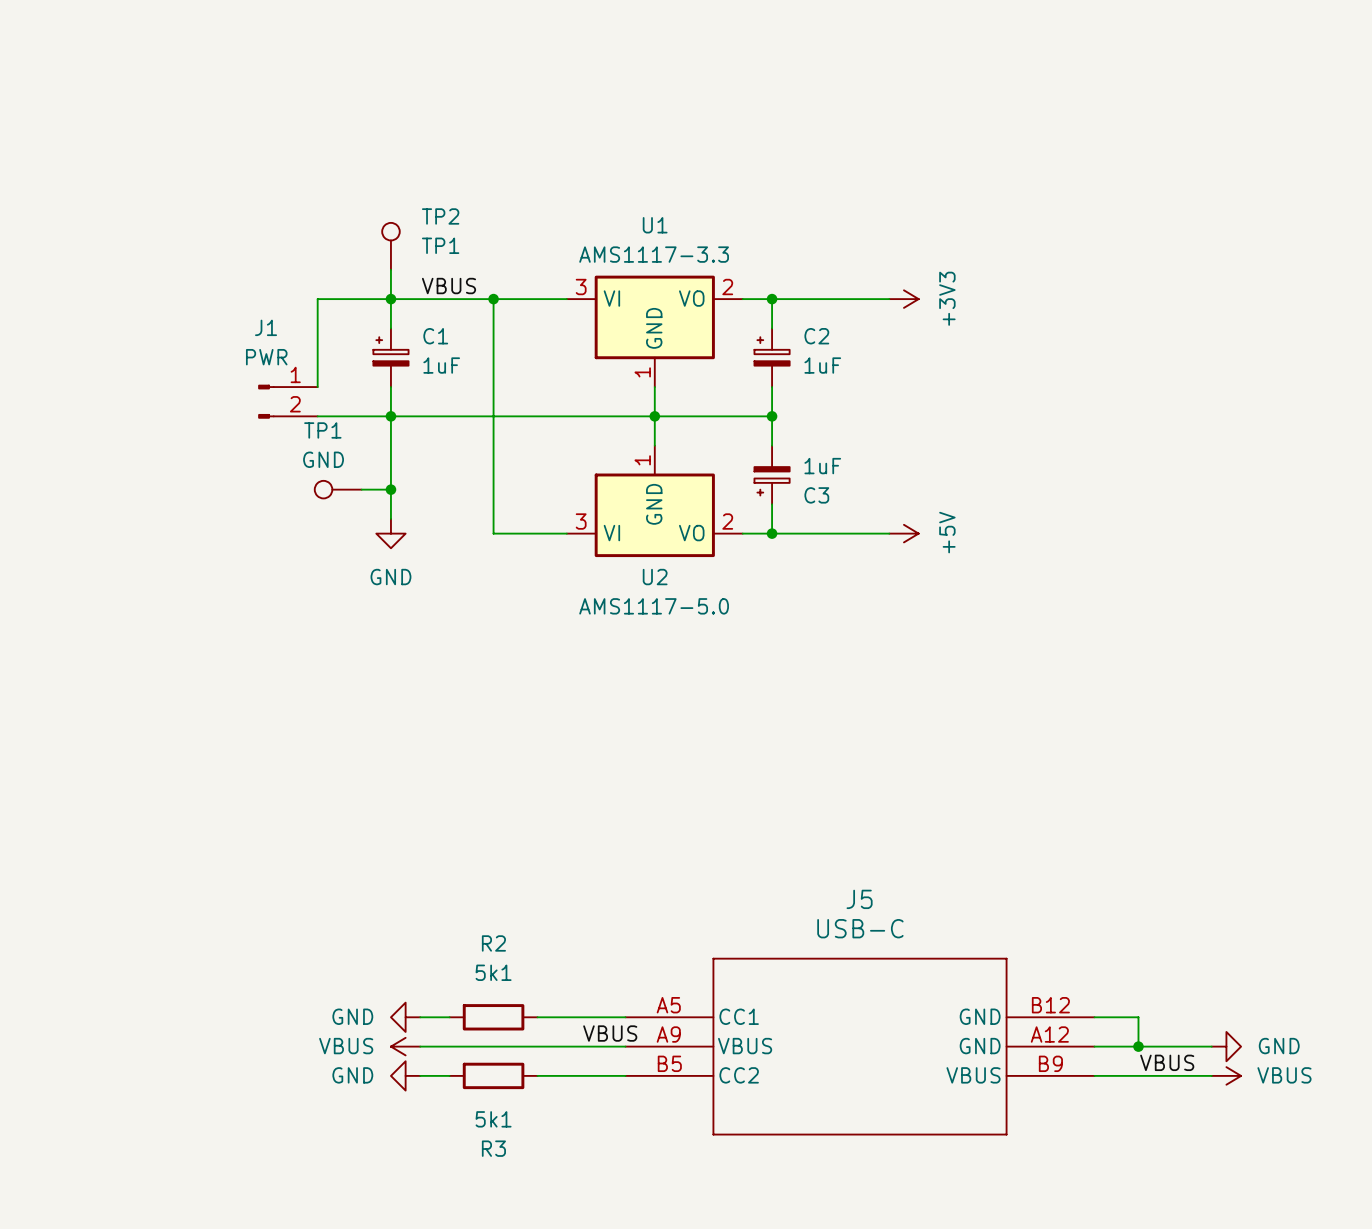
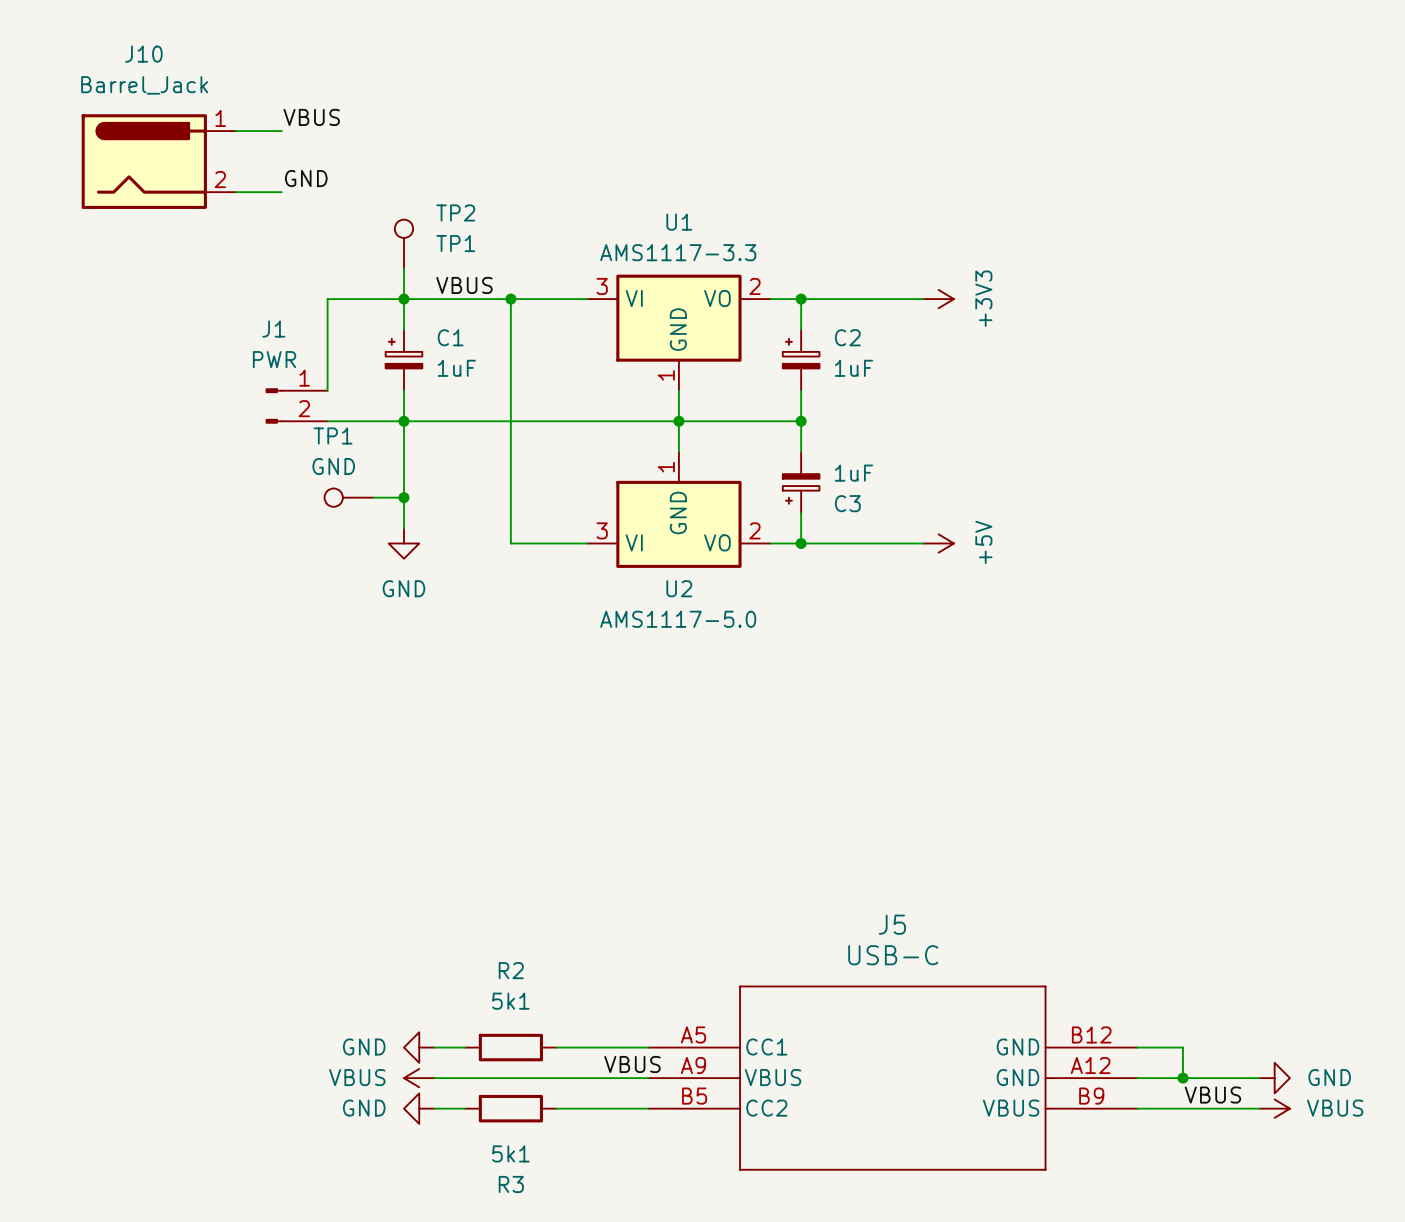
label: none -> VBUS (311, 117)
wire: none -> (235, 131) (281, 131)
J10: none -> Barrel_Jack (158, 161)
label: none -> GND (306, 178)
wire: none -> (235, 192) (281, 192)

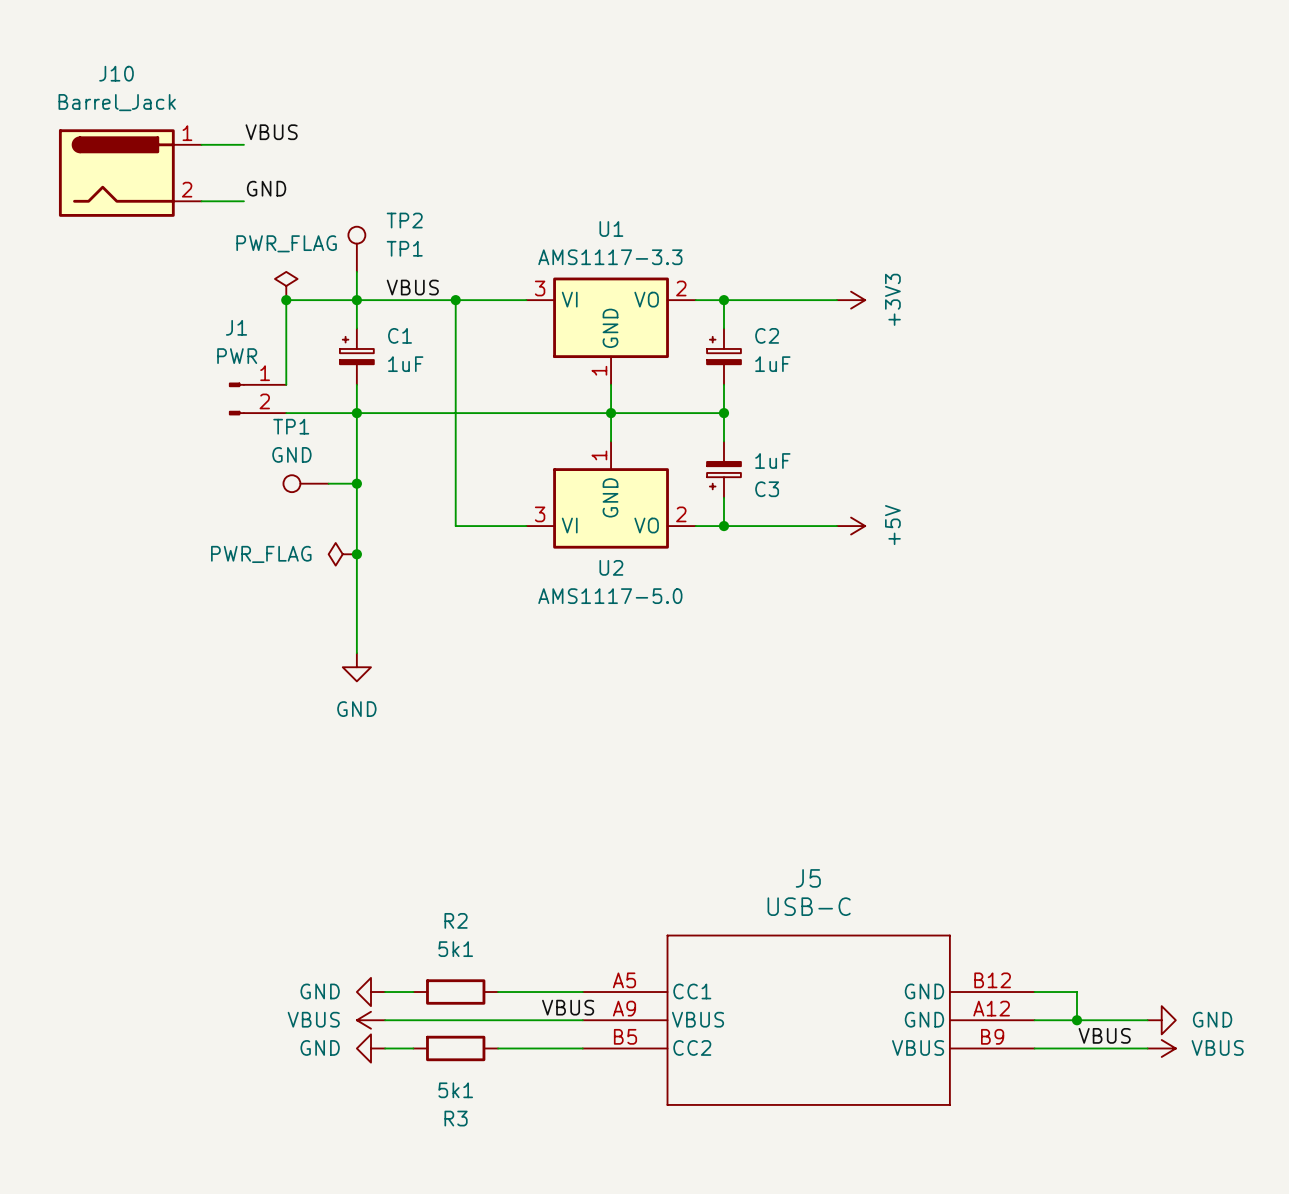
power symbol: none -> PWR_FLAG (286, 286)
junction: none -> (286, 300)
wire: none -> (356, 511) (356, 653)
power symbol position: GND (403, 543) -> GND (356, 667)
power symbol: none -> PWR_FLAG (342, 554)
junction: none -> (356, 554)

